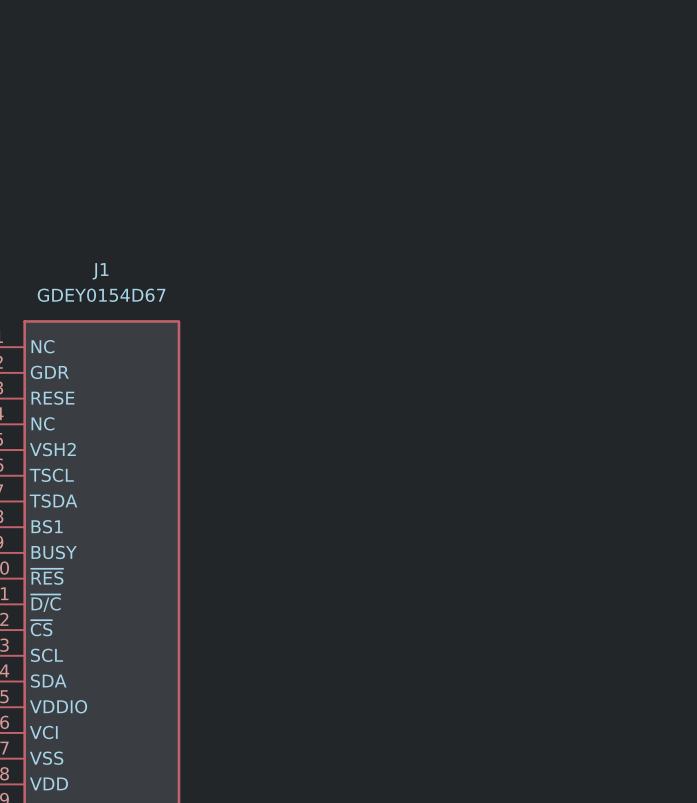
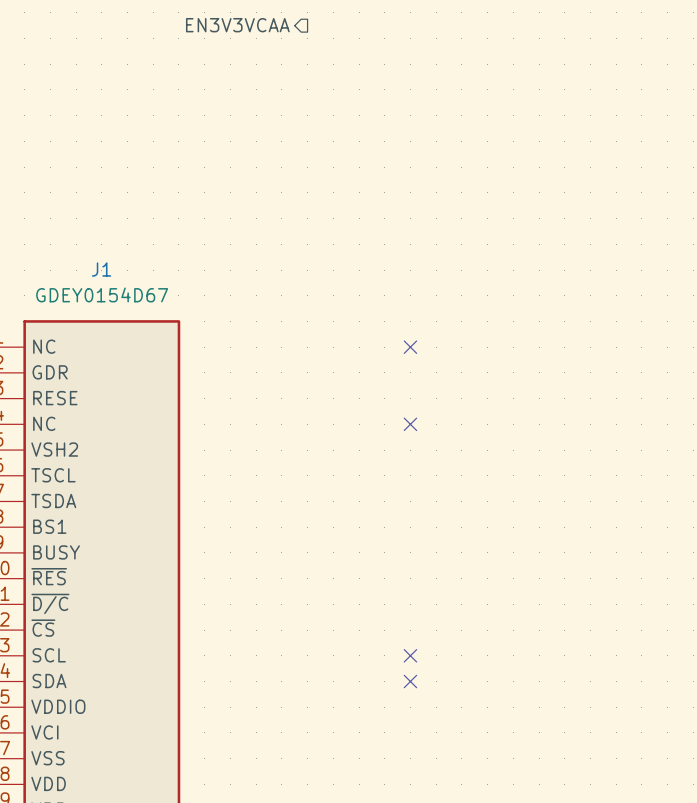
sheet pin: none -> EN3V3VCAA (237, 25)
no-connect mark: none -> (410, 347)
no-connect mark: none -> (410, 424)
no-connect mark: none -> (410, 655)
no-connect mark: none -> (410, 681)

